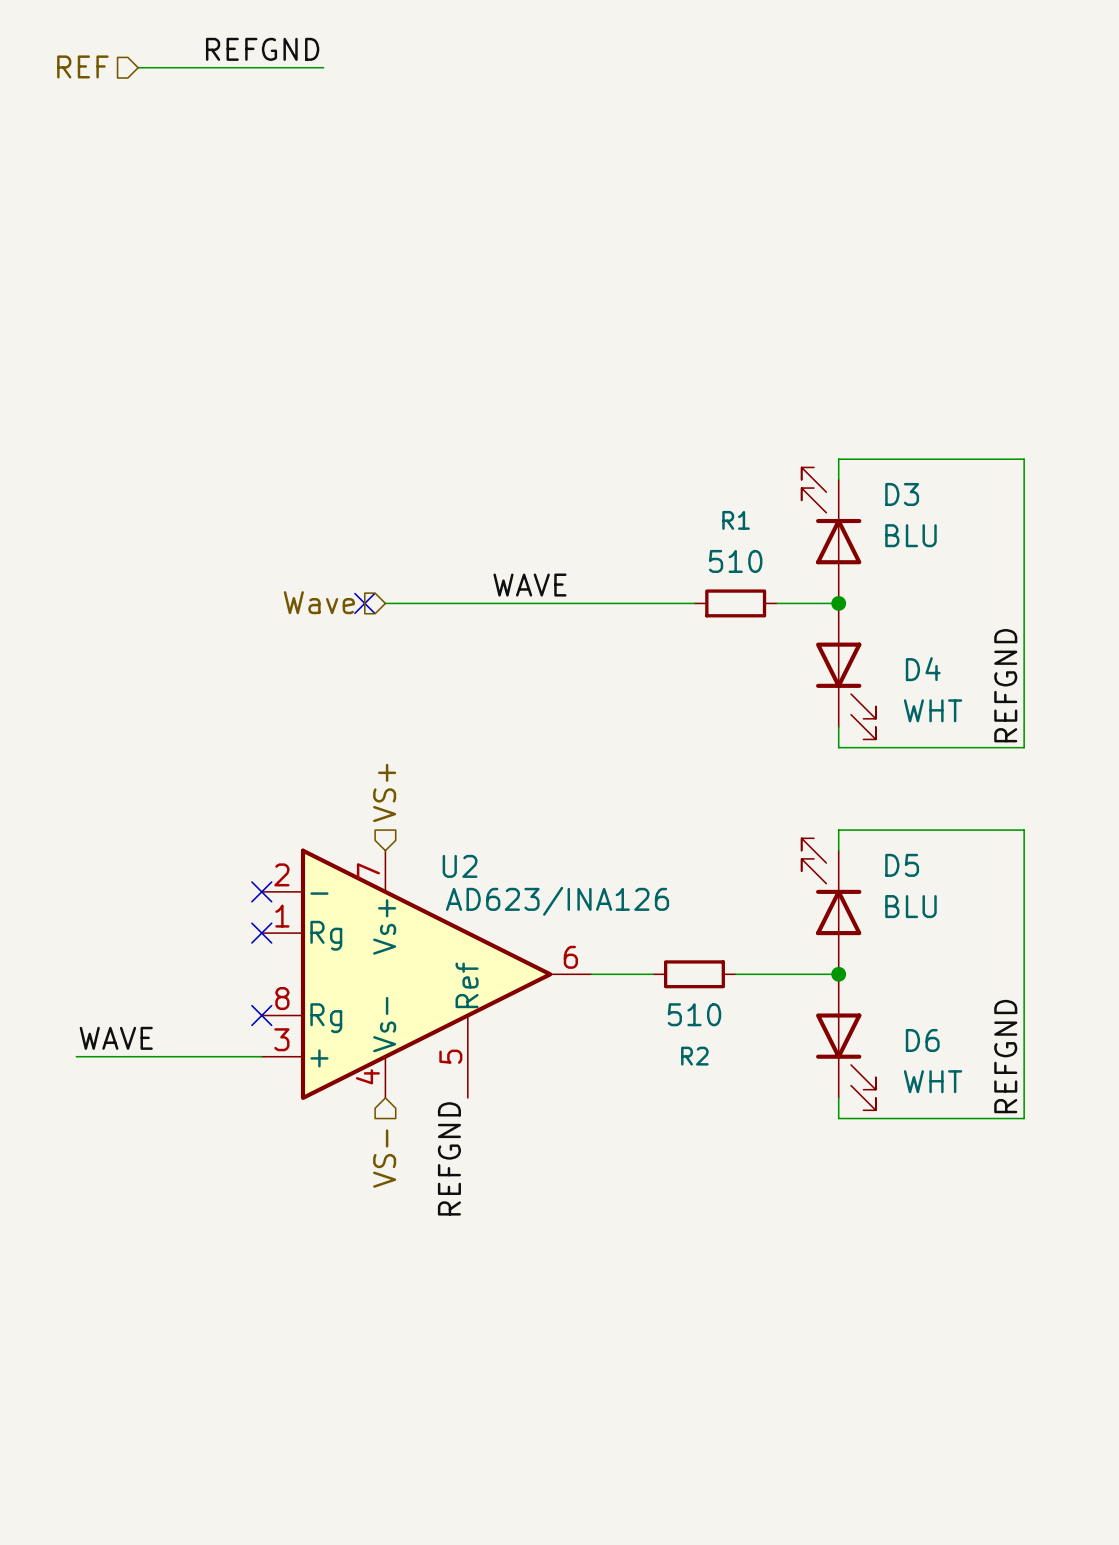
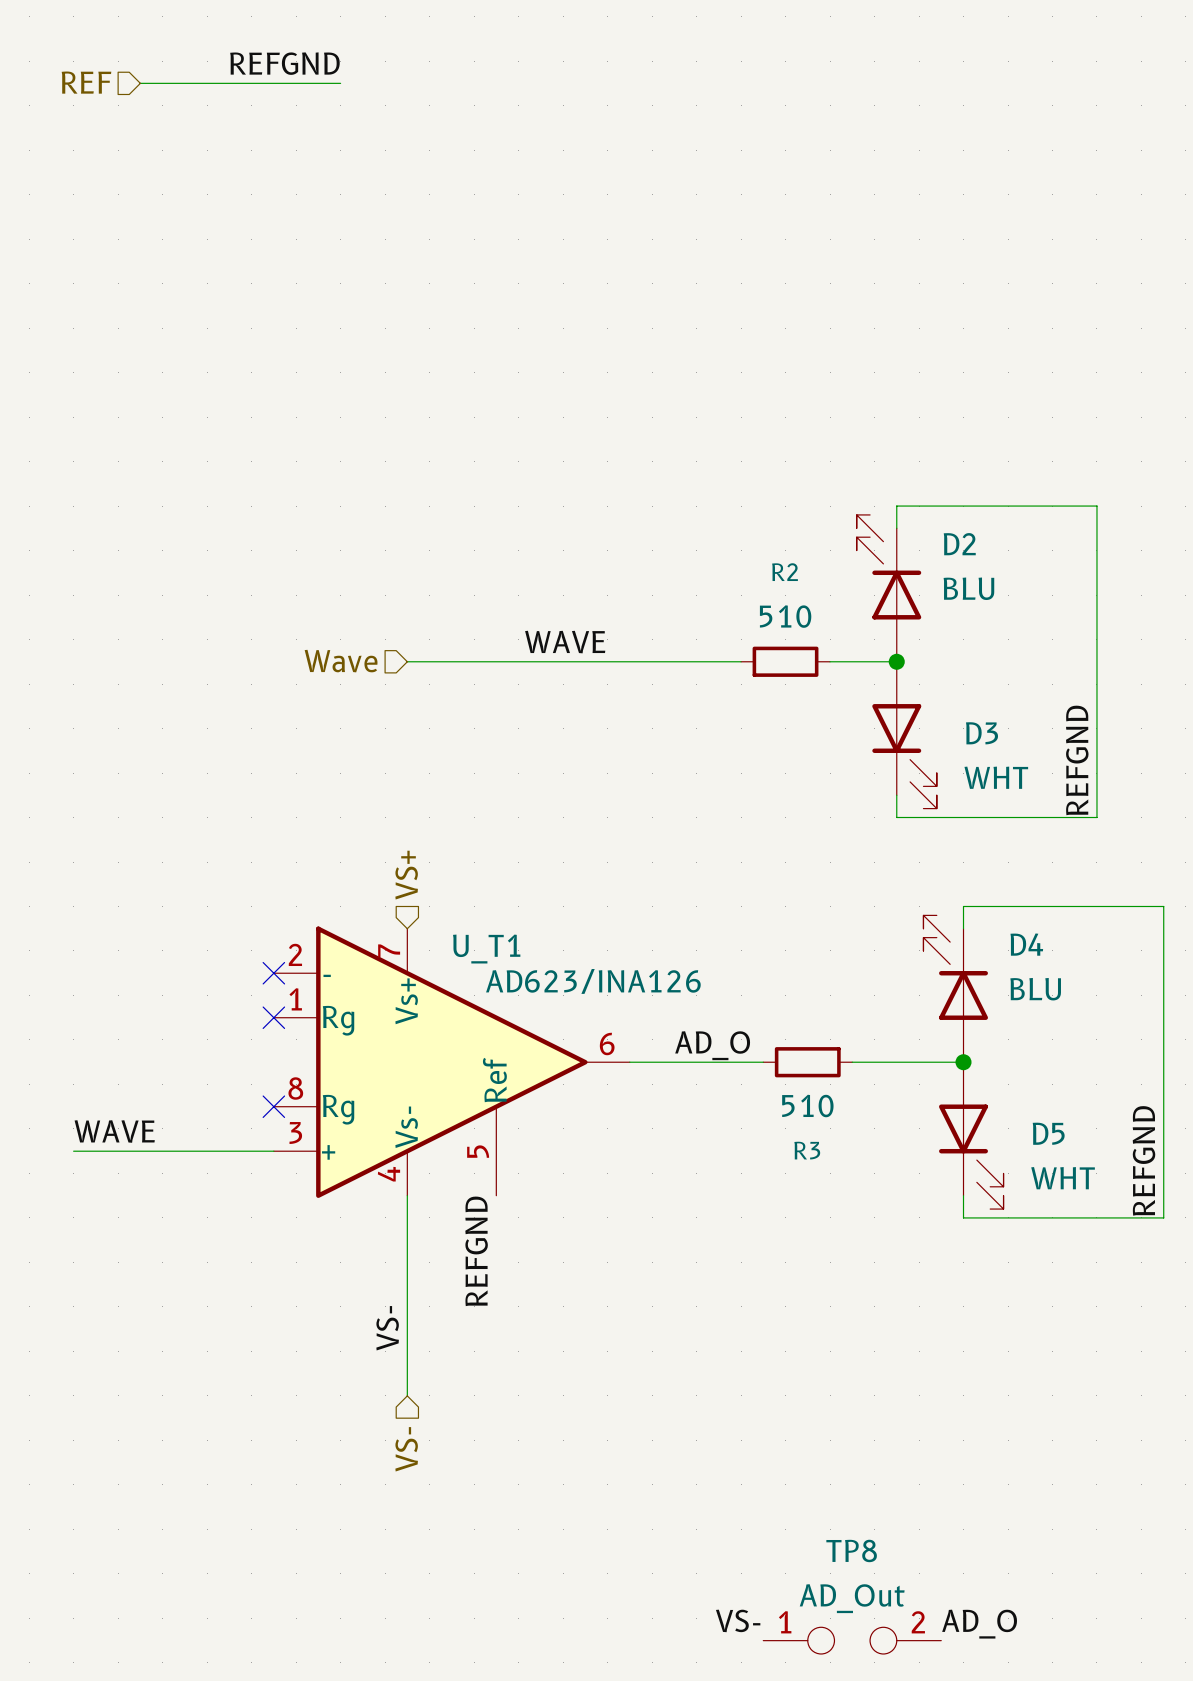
D3 name: D3 (902, 494) -> D2 (959, 544)
R1 name: R1 (736, 520) -> R2 (785, 572)
no-connect mark: (364, 603) -> none
D4 name: D4 (923, 669) -> D3 (982, 733)
wire: (900, 830) (838, 830) (838, 850) -> (963, 906) (963, 928)
wire: (1024, 830) (1024, 1118) -> (1096, 906) (1163, 906) (1163, 1217) (1096, 1217)
D5 name position: D5 (902, 865) -> D5 (1048, 1133)
U2 name: U2 (460, 866) -> U_T1 (486, 949)
D5 rotation: 0° (831, 886) -> 180° (971, 1156)
D5 position: (831, 906) -> (971, 1135)
D4: none -> BLU (955, 988)
D5 value: BLU (910, 906) -> WHT (1063, 1178)
label: none -> AD_O (712, 1045)
R2: 510 (694, 974) -> none
wire: (735, 974) (797, 974) -> (696, 1062) (763, 1062)
R3: none -> 510 (807, 1062)
wire: none -> (896, 1062) (963, 1062)
junction position: (838, 974) -> (963, 1062)
D6: WHT (845, 1042) -> none
label position: REFGND (1005, 1056) -> REFGND (1143, 1160)
wire: none -> (407, 1195) (407, 1395)
wire: (838, 1097) (838, 1118) (900, 1118) -> (963, 1195) (963, 1217)
hierarchical label position: VS- (384, 1158) -> VS- (406, 1449)
label: none -> VS- (387, 1328)
label: none -> VS- (738, 1620)
label: none -> AD_O (979, 1624)
TP8: none -> AD_Out (852, 1640)

